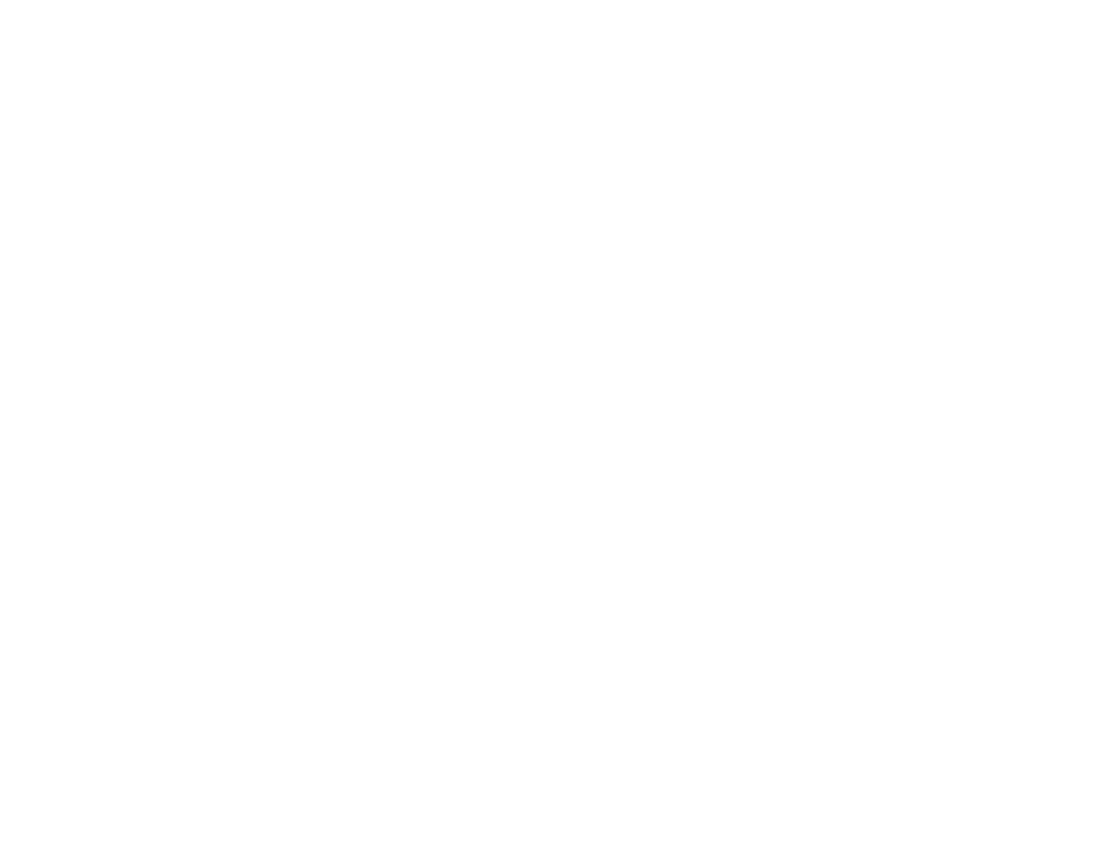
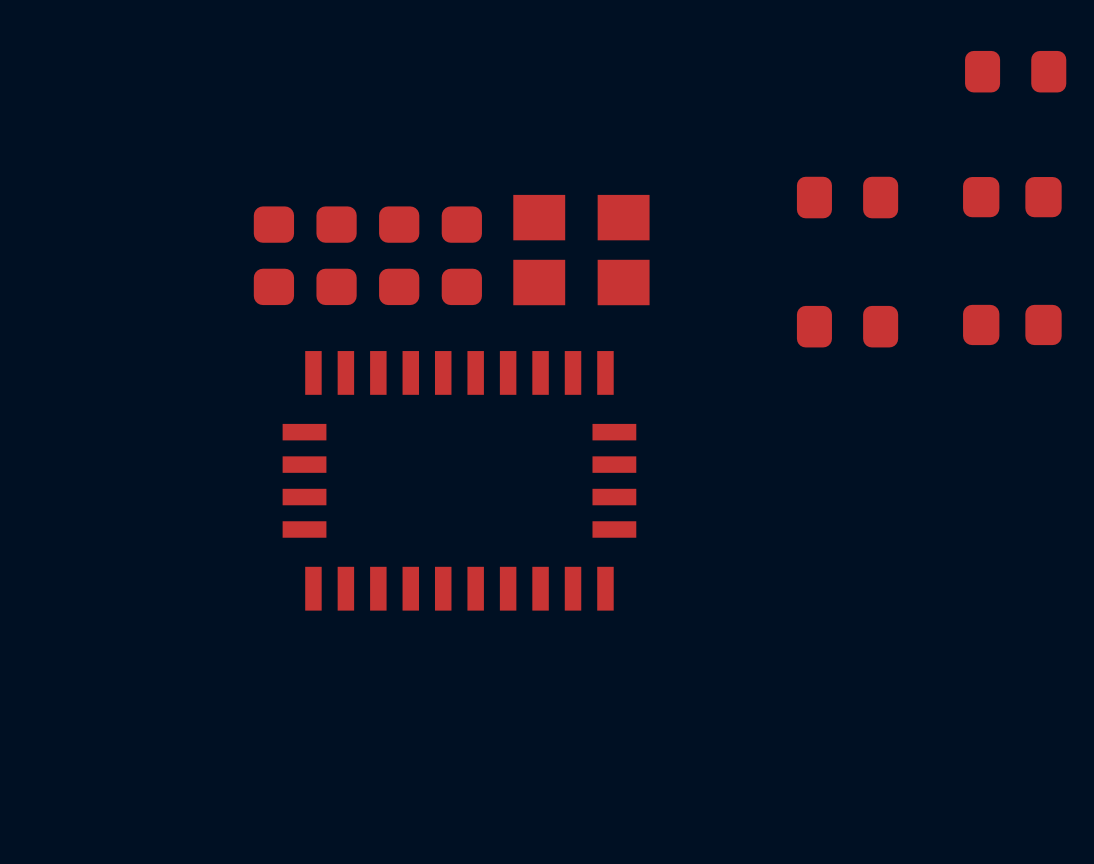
part: none -> (1015, 71)
part: none -> (847, 197)
part: none -> (1012, 197)
part: none -> (581, 250)
part: none -> (273, 255)
part: none -> (336, 255)
part: none -> (399, 255)
part: none -> (461, 255)
part: none -> (1012, 324)
part: none -> (847, 326)
part: none -> (459, 480)

